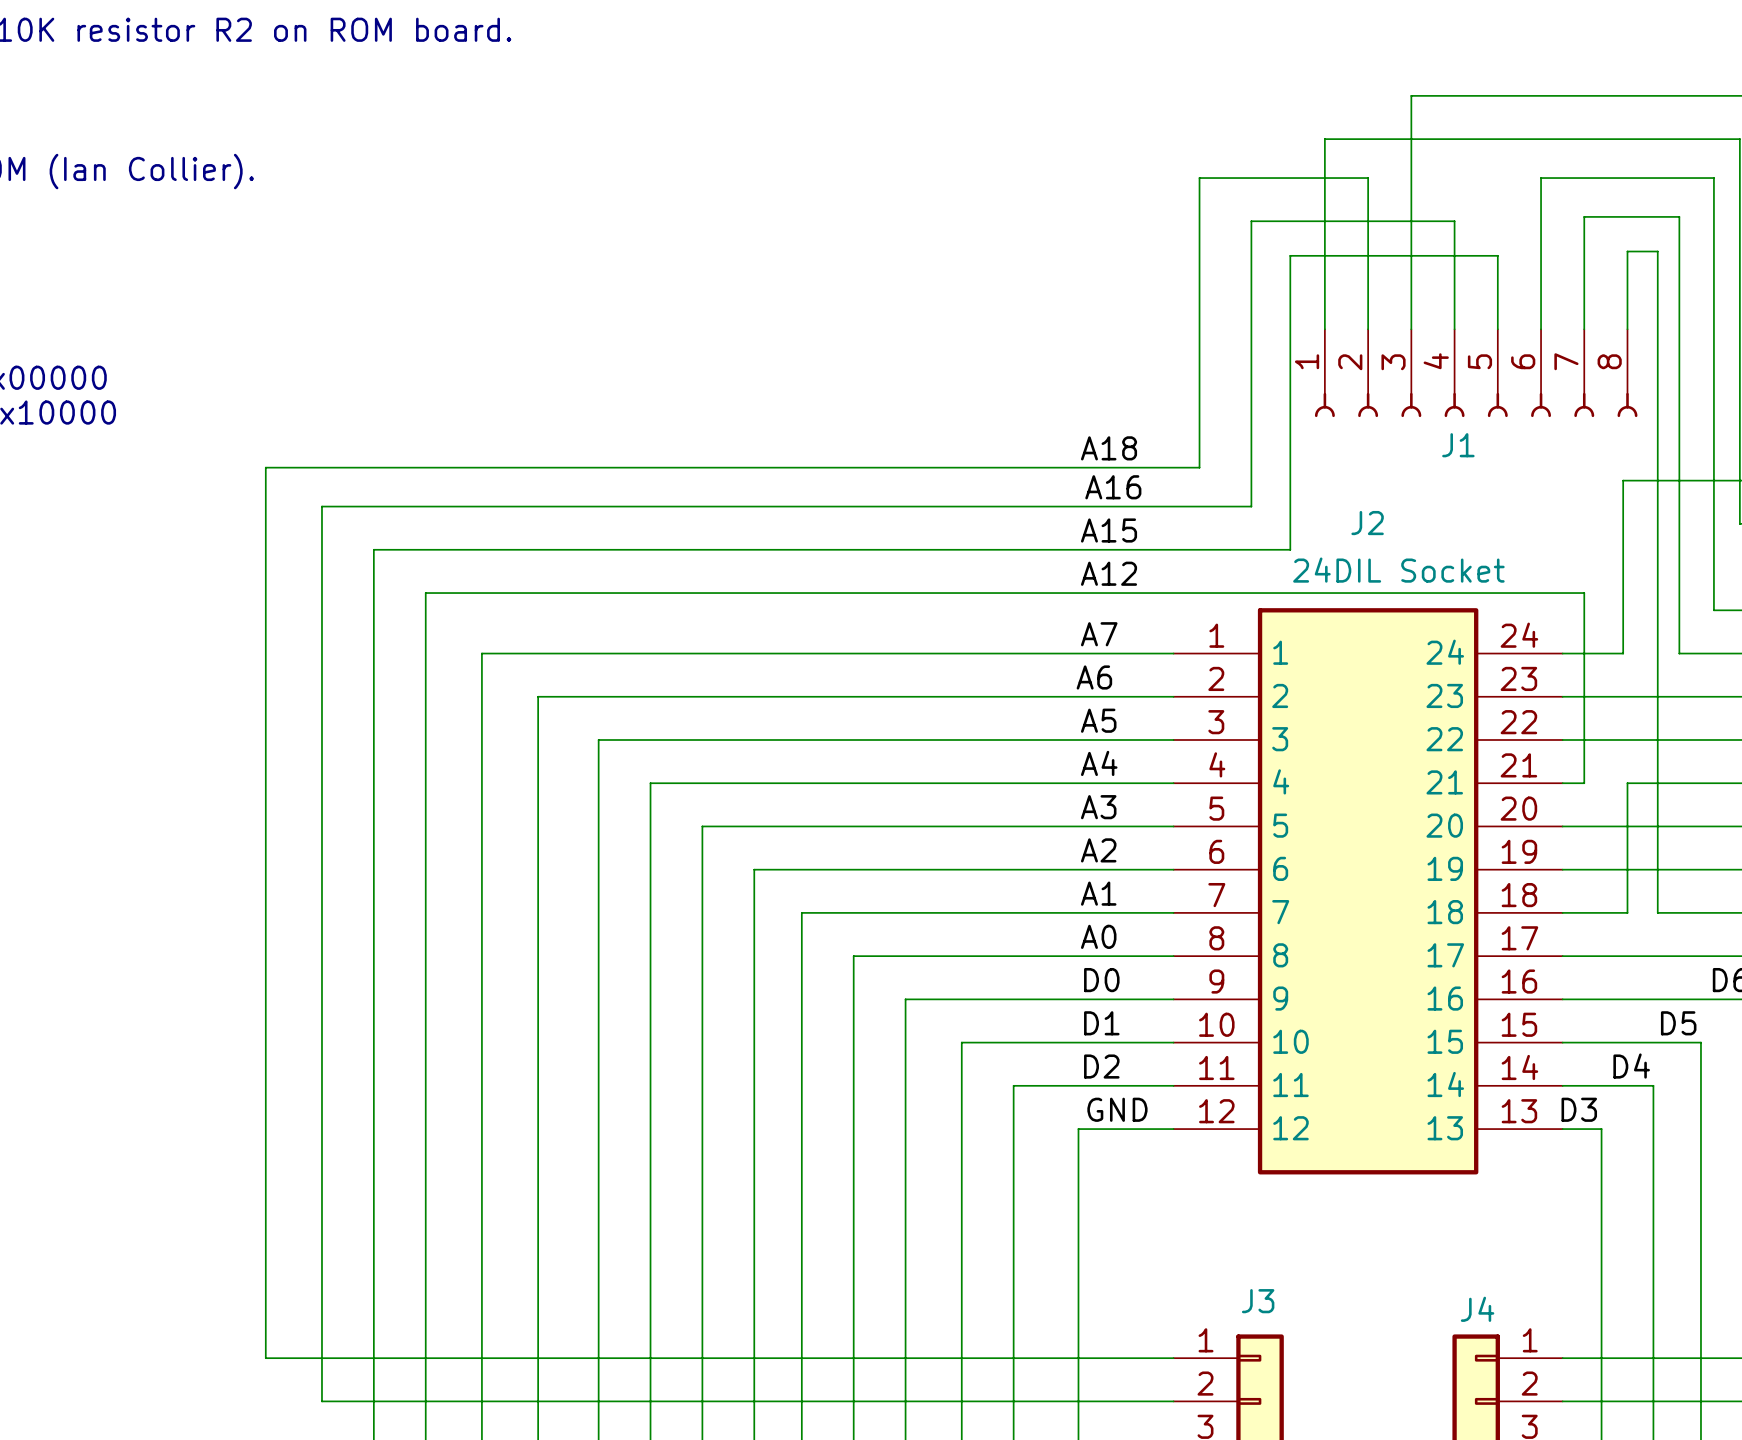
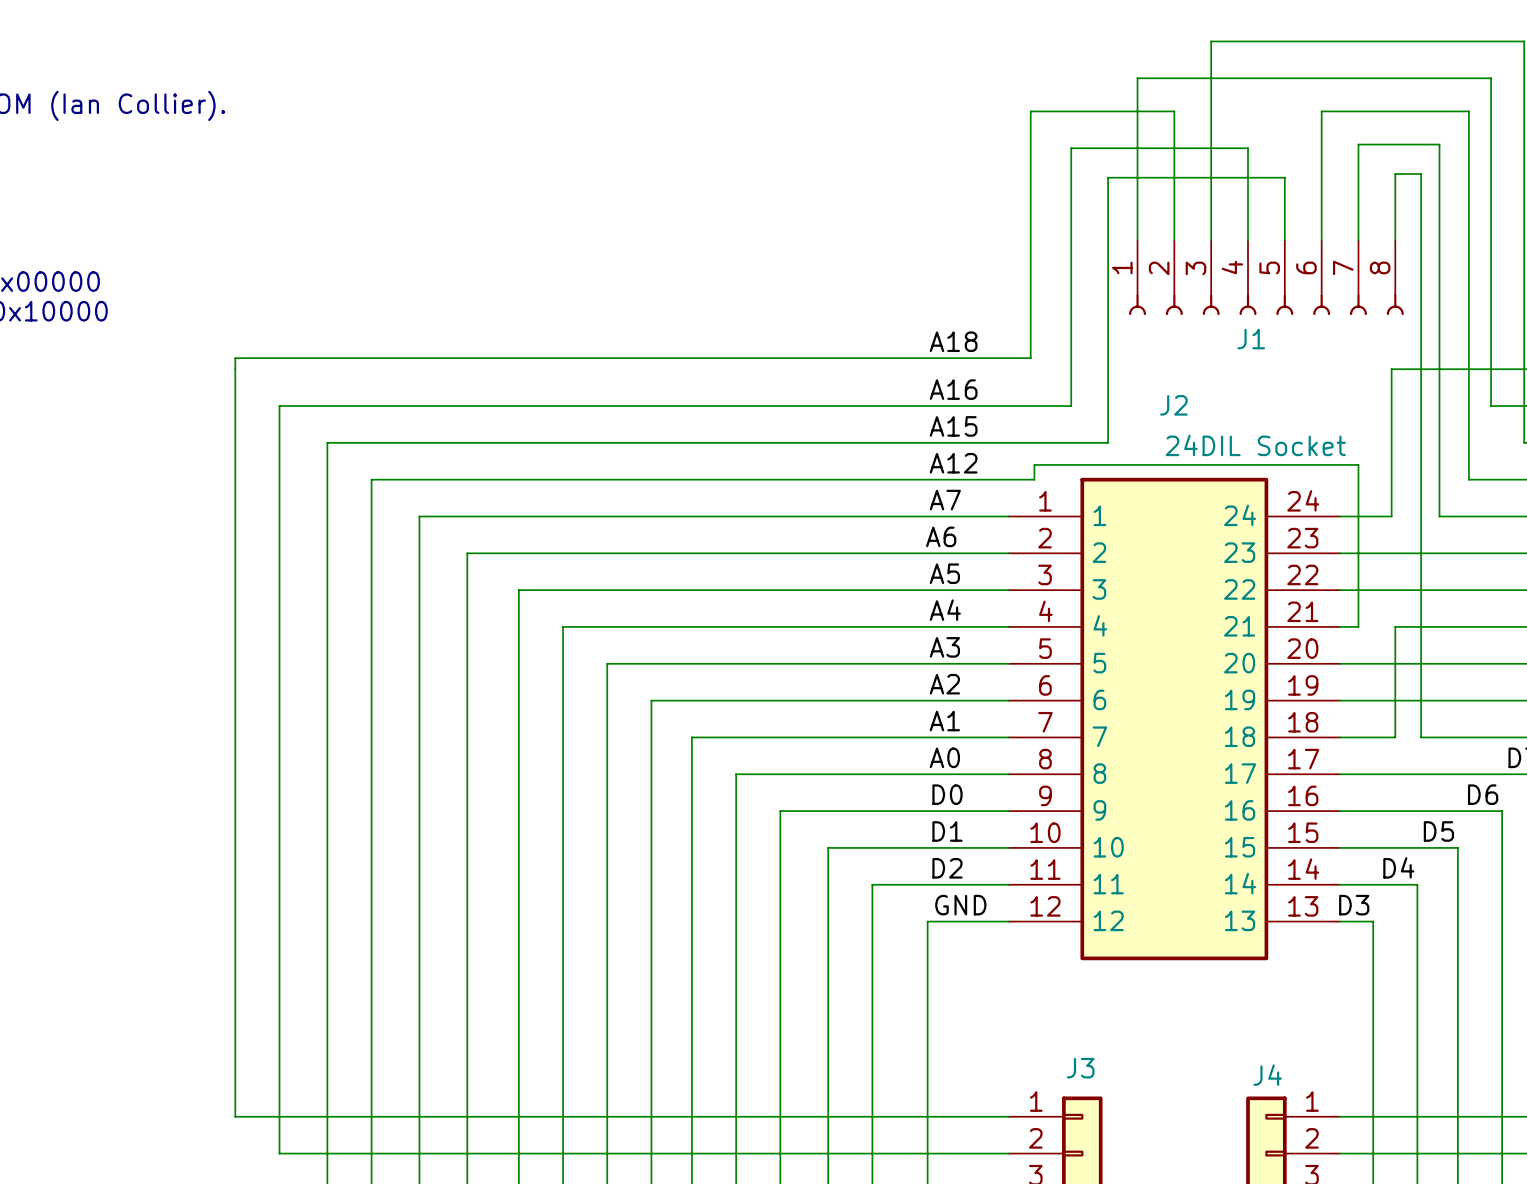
wire: (1251, 221) (1251, 506) (321, 506) (321, 1401) -> (1074, 148) (1071, 148) (1071, 406) (279, 406) (279, 1153) (283, 1153)
label position: A16 (1113, 487) -> A16 (953, 389)
label position: A15 (1109, 530) -> A15 (953, 426)
wire: (1290, 549) (373, 549) (373, 567) -> (1108, 428) (1108, 442) (327, 442)
J2 value position: 24DIL Socket (1398, 570) -> 24DIL Socket (1255, 445)
label position: A12 (1109, 573) -> A12 (953, 463)
wire: (1203, 593) (425, 593) (425, 610) -> (1034, 464) (1034, 479) (371, 479)

